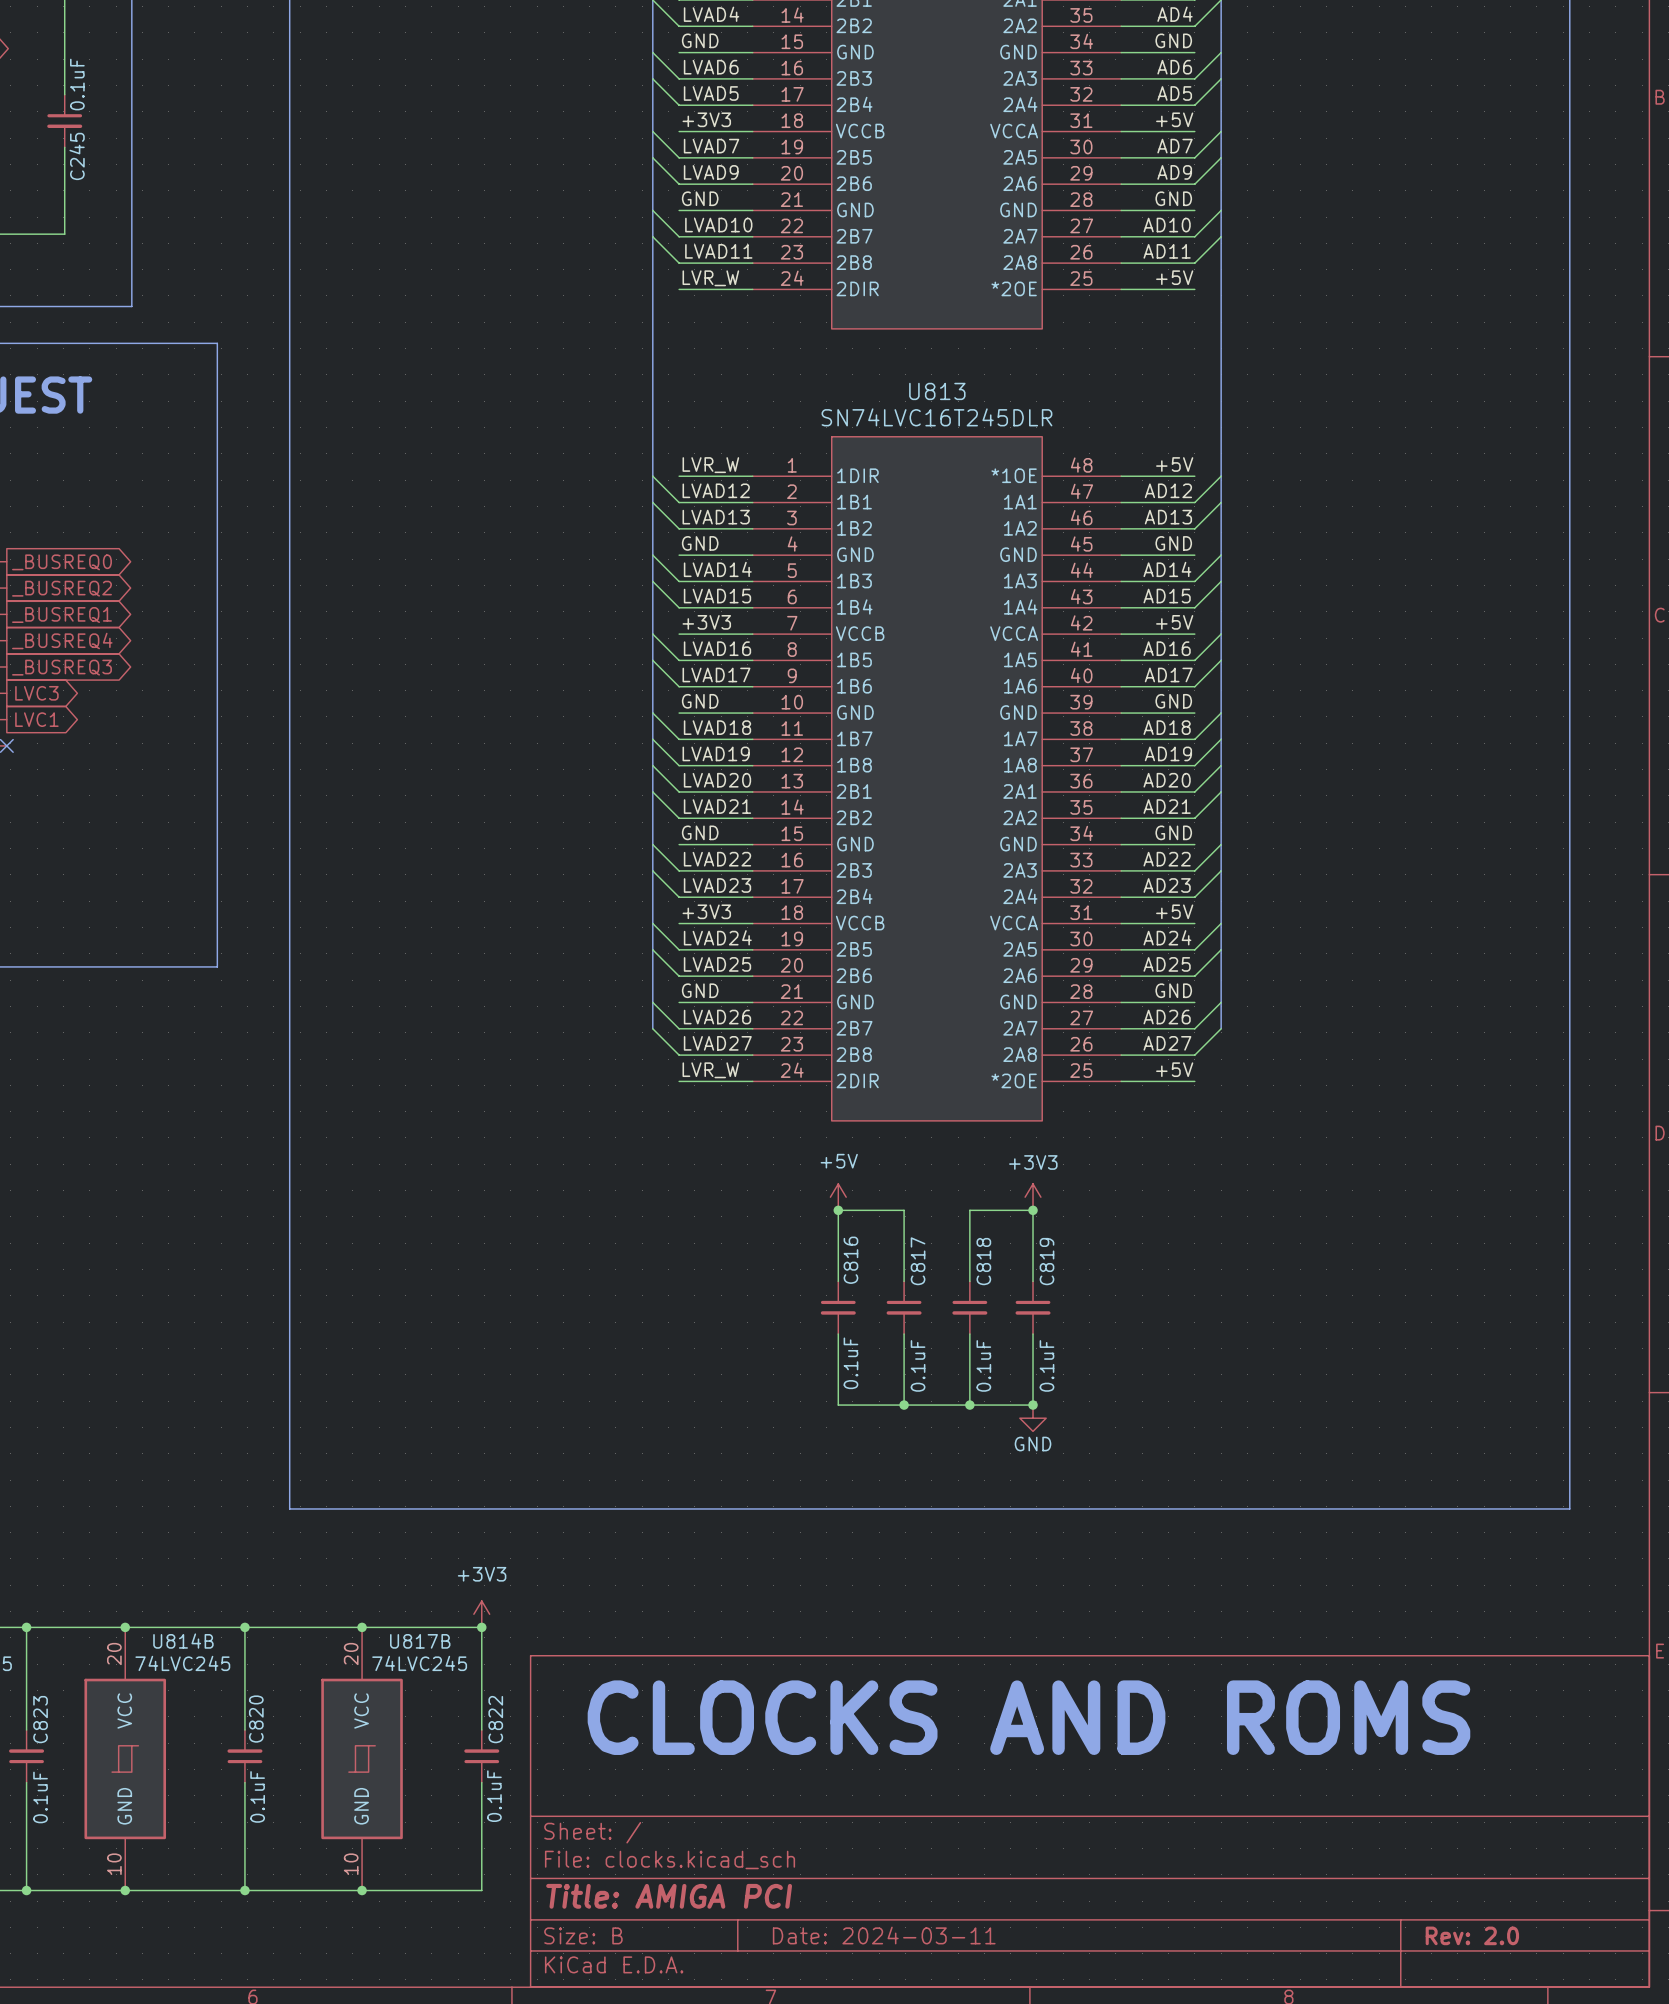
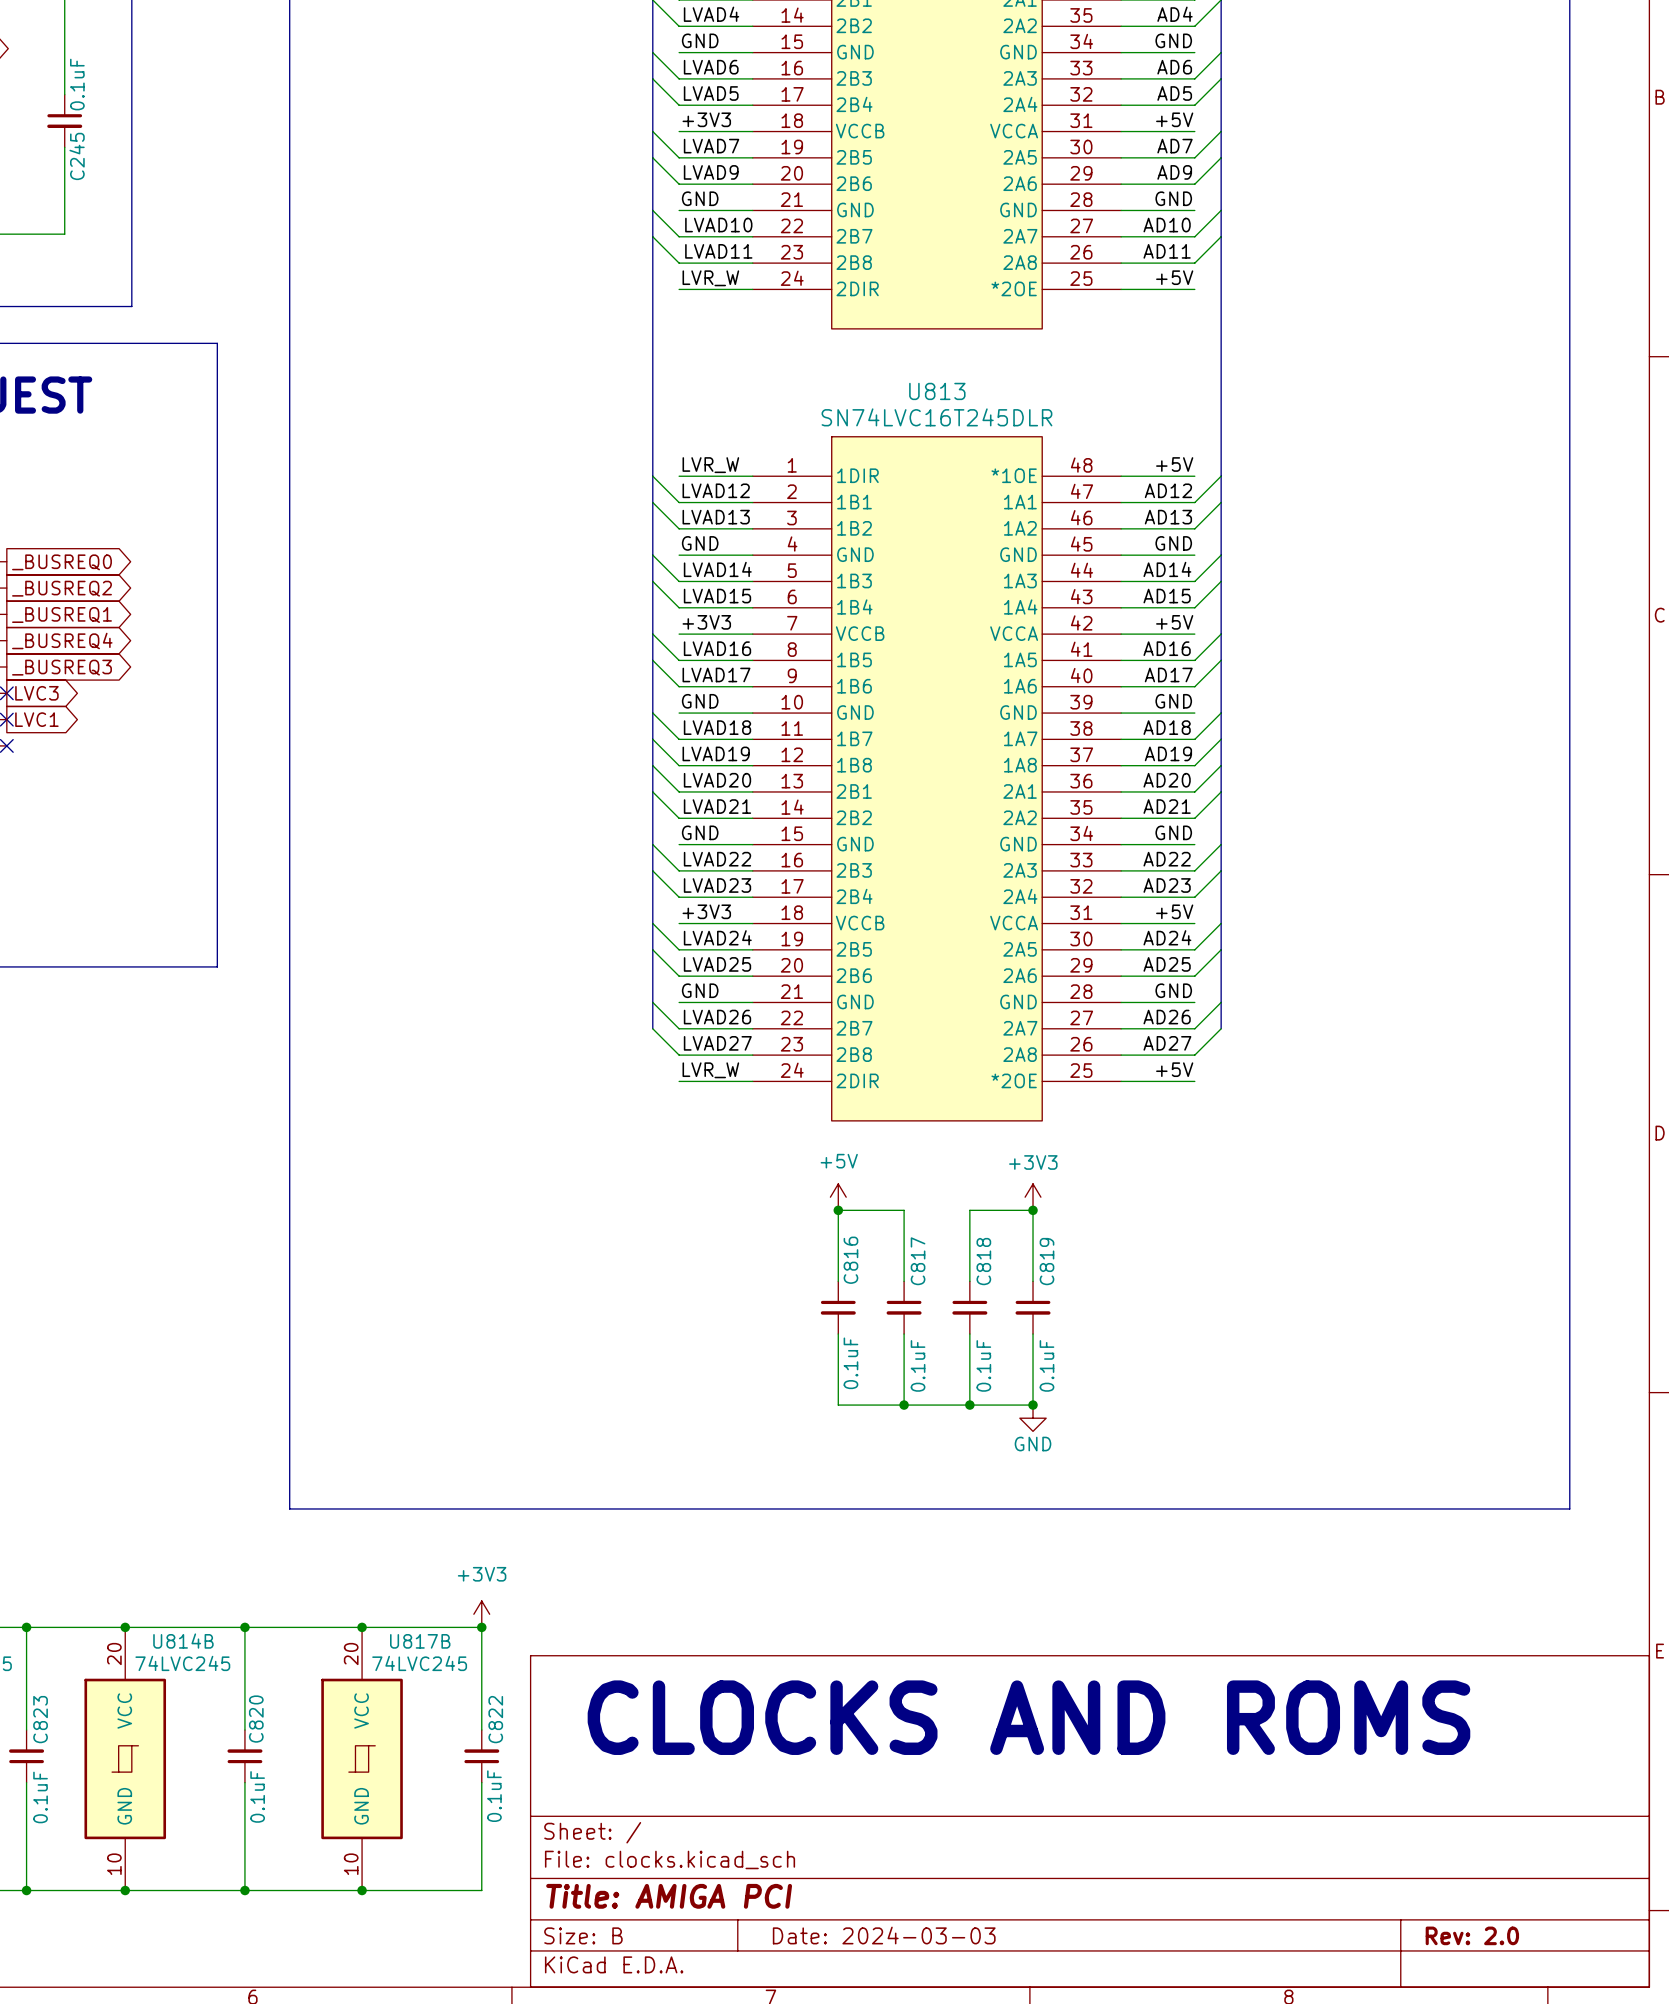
no-connect mark: none -> (6, 693)
no-connect mark: none -> (6, 719)
title block: Date: 2024-03-11 (884, 1935) -> Date: 2024-03-03 (884, 1935)

